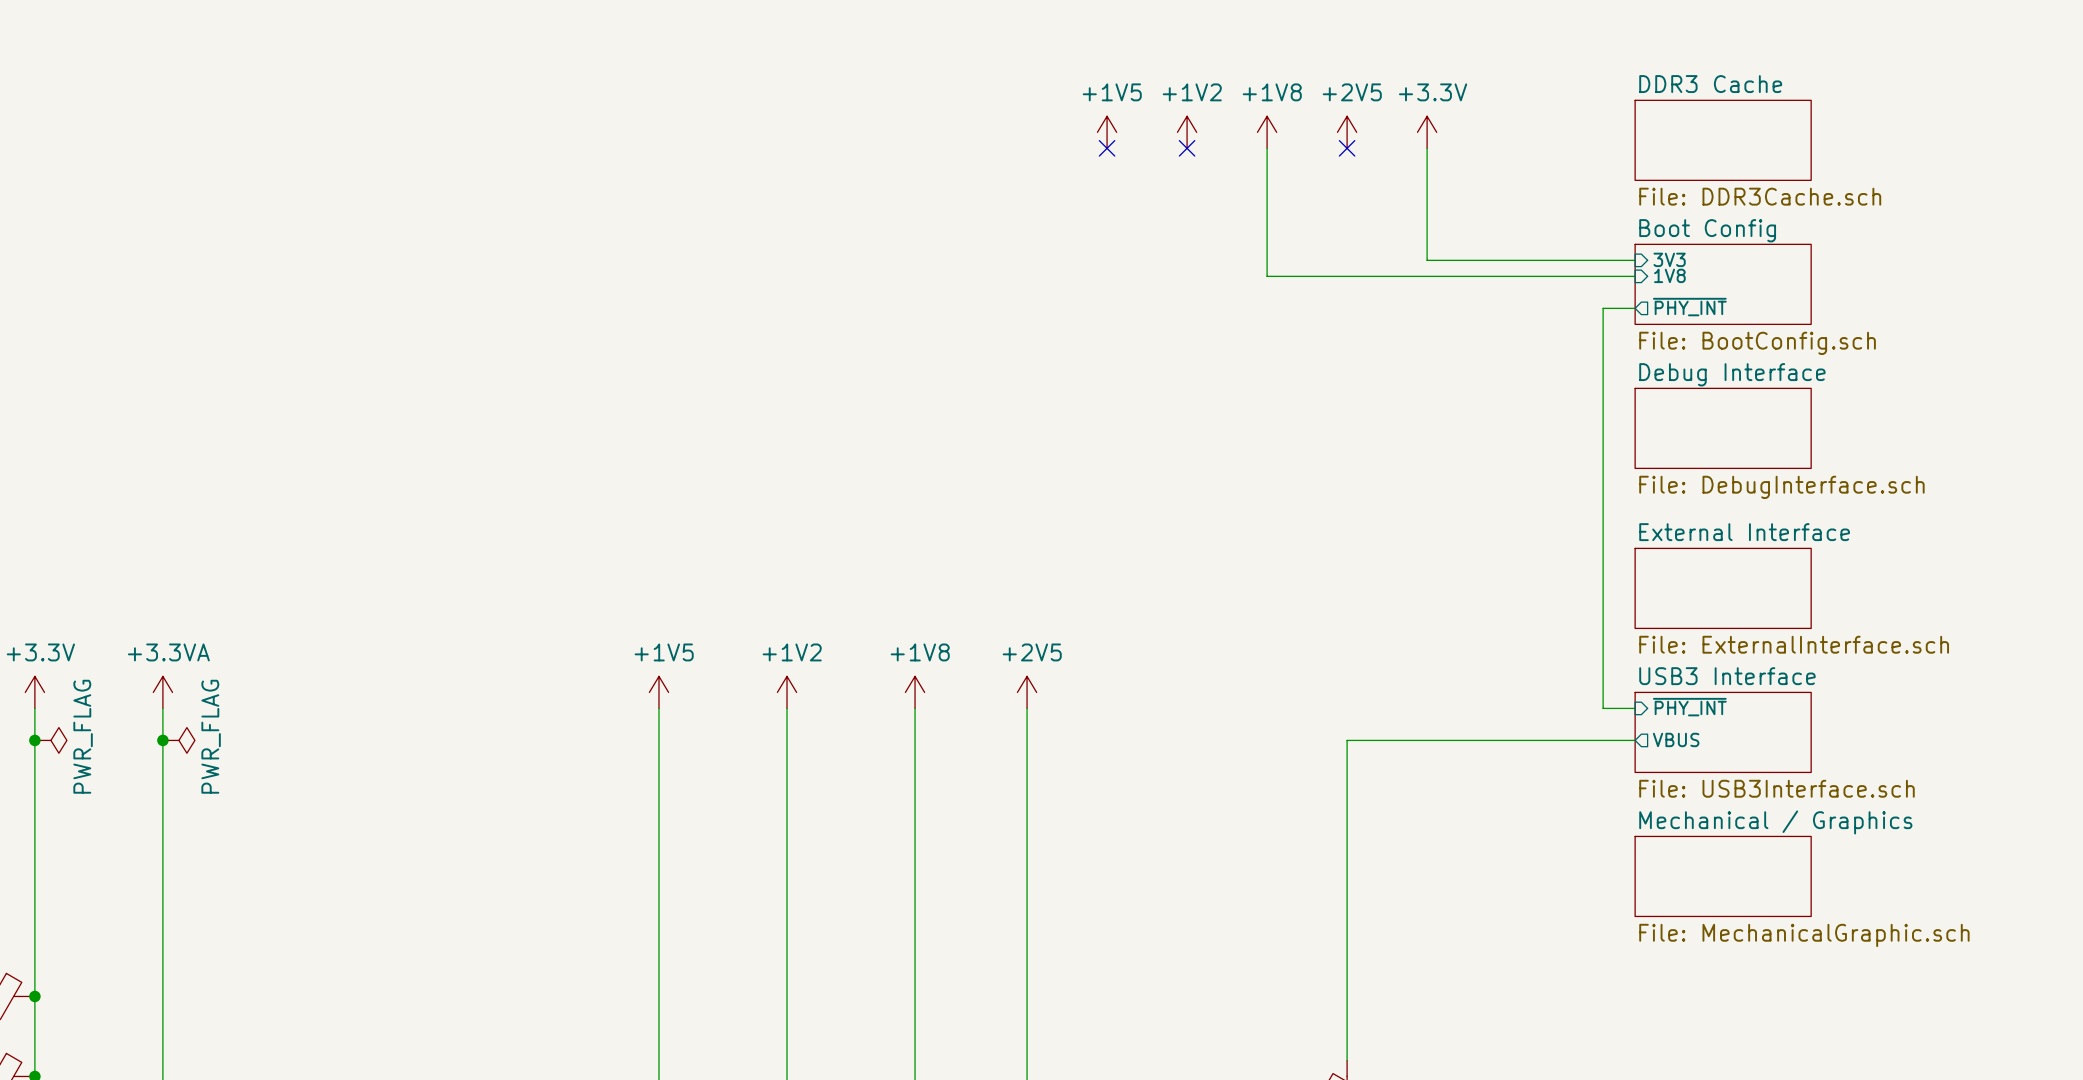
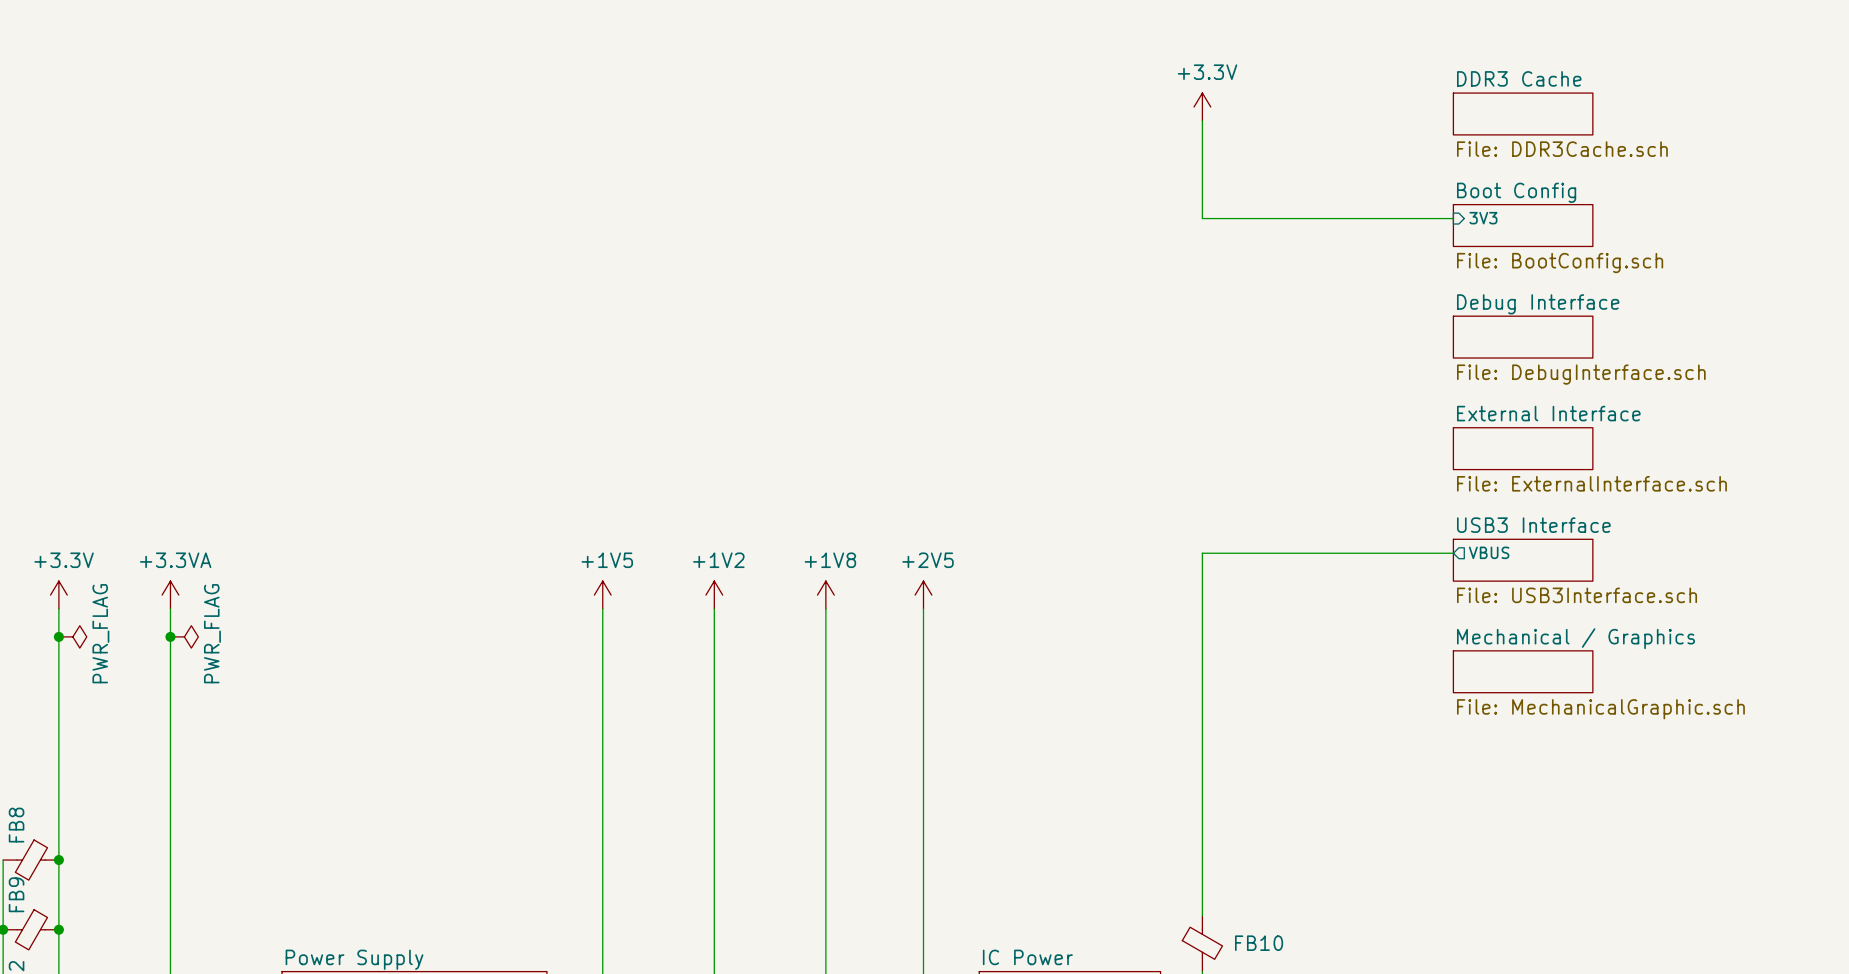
sheet DDR3 Cache shape: [1635, 100, 1812, 181] -> [1453, 93, 1593, 135]
power symbol: +1V5 (1107, 132) -> none
power symbol: +1V2 (1187, 132) -> none
power symbol: +1V8 (1267, 132) -> none
power symbol: +2V5 (1347, 132) -> +3.3V (1202, 107)
power symbol: +3.3V (1427, 132) -> none
no-connect mark: (1107, 148) -> none
no-connect mark: (1187, 148) -> none
wire: (1267, 148) (1267, 276) (1635, 276) -> none
no-connect mark: (1347, 148) -> none
wire: (1427, 148) (1427, 260) -> (1202, 120) (1202, 218) (1272, 218)
sheet Boot Config: none -> File: BootConfig.sch (1523, 225)
sheet pin: 1V8 (1669, 275) -> none
sheet Boot Config: File: BootConfig.sch (1723, 284) -> none
sheet pin: ~{PHY_INT} (1689, 307) -> none
wire: (1635, 308) (1603, 308) (1603, 708) (1635, 708) -> none
sheet Debug Interface: none -> File: DebugInterface.sch (1523, 337)
sheet Debug Interface: File: DebugInterface.sch (1723, 428) -> none
sheet External Interface: none -> File: ExternalInterface.sch (1523, 448)
sheet External Interface: File: ExternalInterface.sch (1723, 588) -> none
sheet USB3 Interface shape: [1635, 692, 1812, 773] -> [1453, 539, 1593, 582]
sheet pin: ~{PHY_INT} (1689, 707) -> none
sheet pin position: VBUS (1676, 739) -> VBUS (1489, 552)
wire: (1347, 740) (1635, 740) -> (1202, 636) (1202, 553) (1453, 553)
sheet Mechanical / Graphics: none -> File: MechanicalGraphic.sch (1523, 671)
sheet Mechanical / Graphics: File: MechanicalGraphic.sch (1723, 876) -> none

